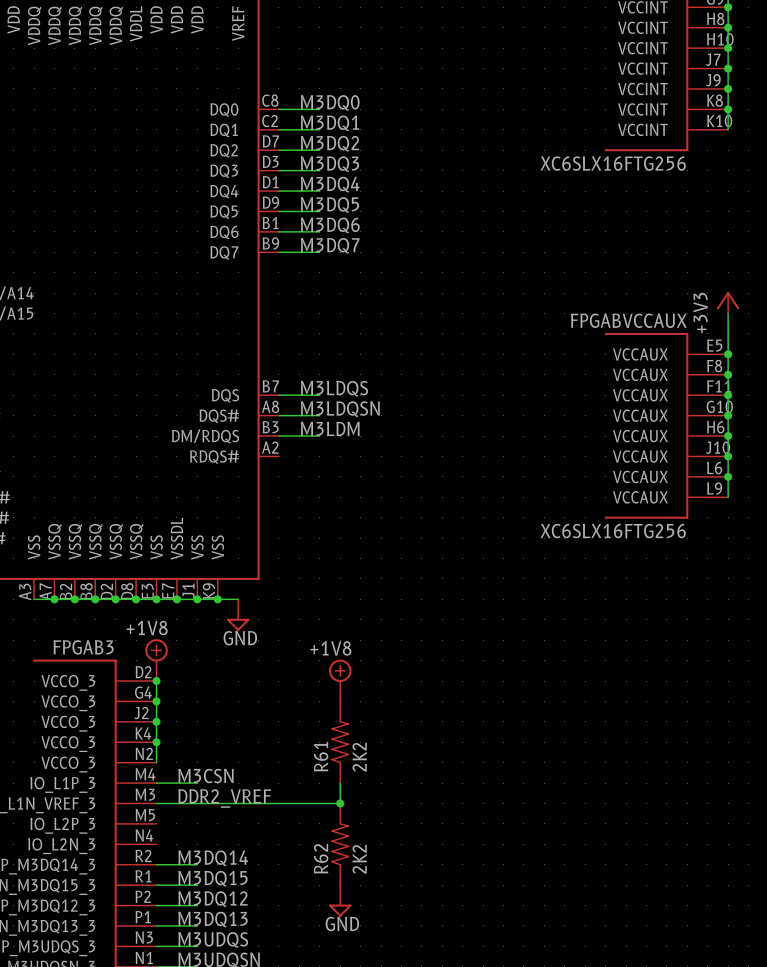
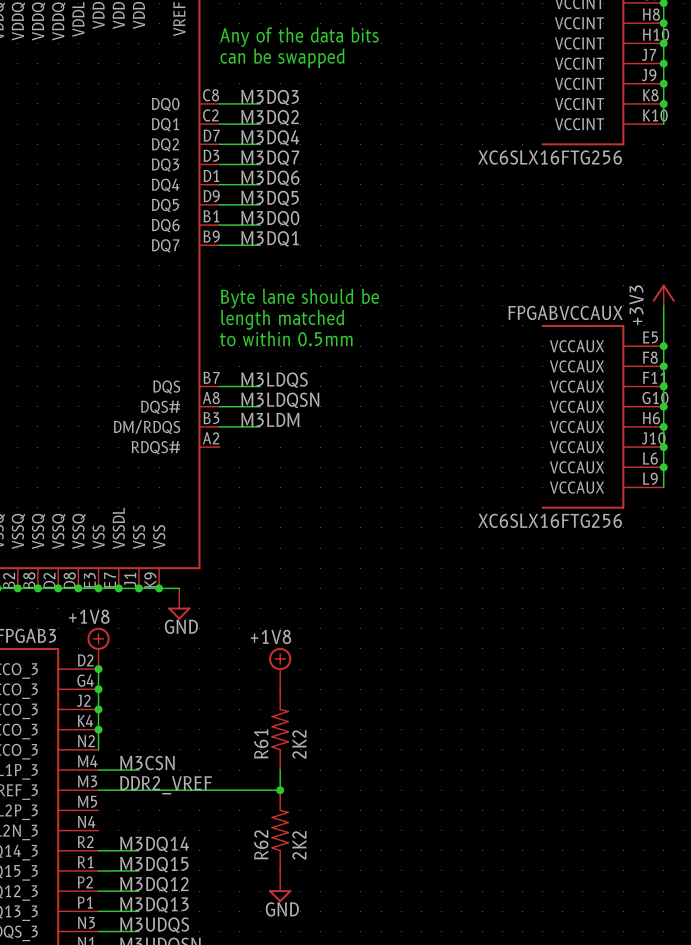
text: none -> Any of the data bits (299, 37)
text: none -> can be swapped (282, 58)
label: M3DQ0 (330, 102) -> M3DQ3 (270, 97)
label: M3DQ1 (329, 123) -> M3DQ2 (270, 117)
label: M3DQ2 (329, 143) -> M3DQ4 (270, 137)
label: M3DQ3 (329, 164) -> M3DQ7 (270, 158)
label: M3DQ4 (330, 184) -> M3DQ6 (270, 178)
label: M3DQ6 (330, 225) -> M3DQ0 (270, 218)
label: M3DQ7 (330, 245) -> M3DQ1 (270, 238)
text: none -> Byte lane should be (299, 298)
text: none -> length matched (282, 319)
text: none -> to within 0.5mm (286, 338)

